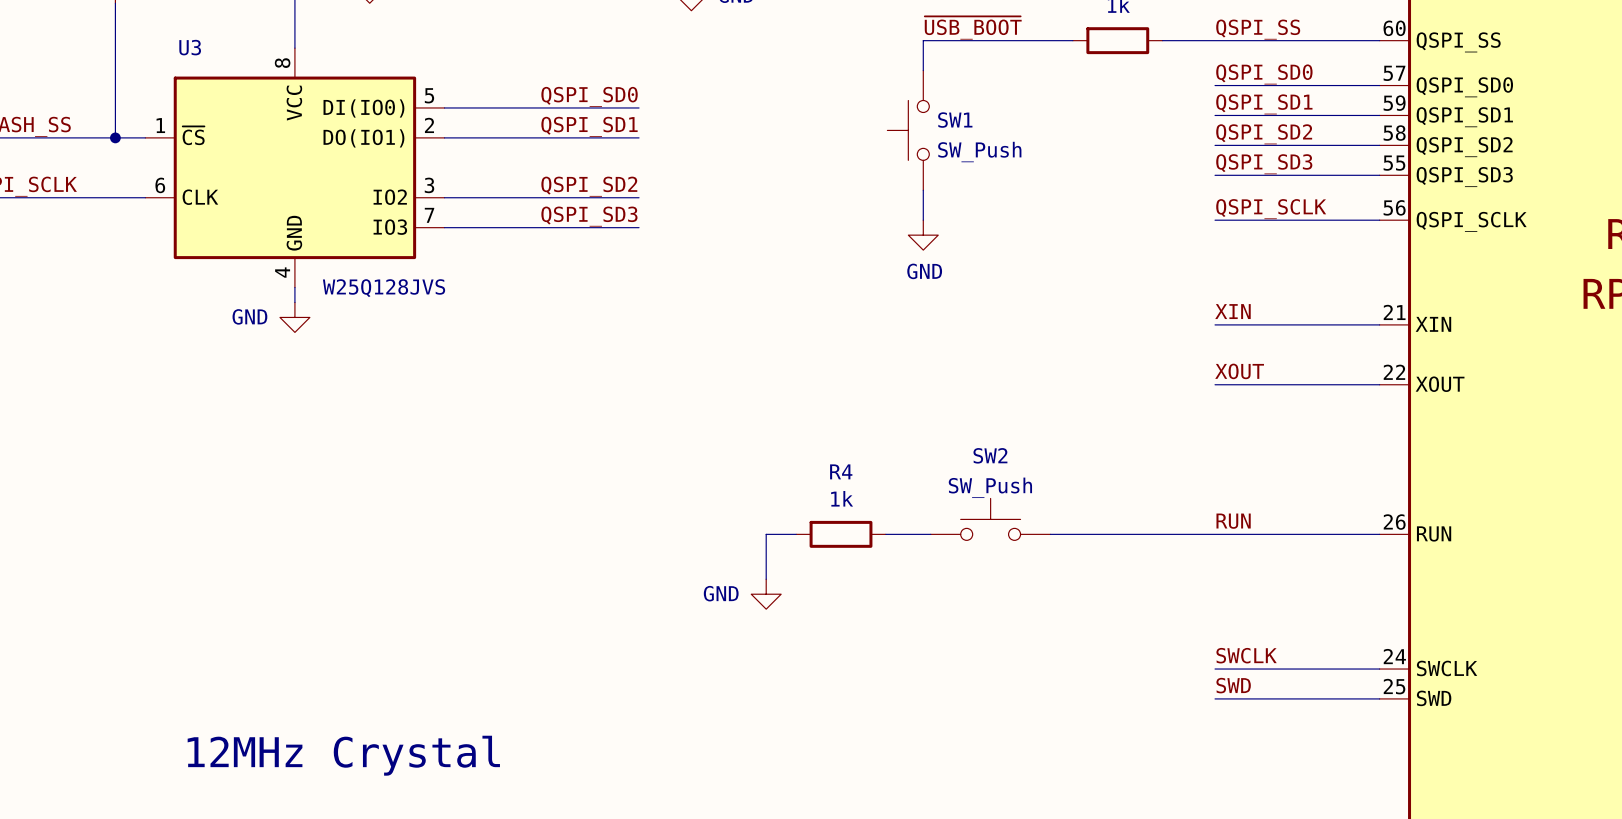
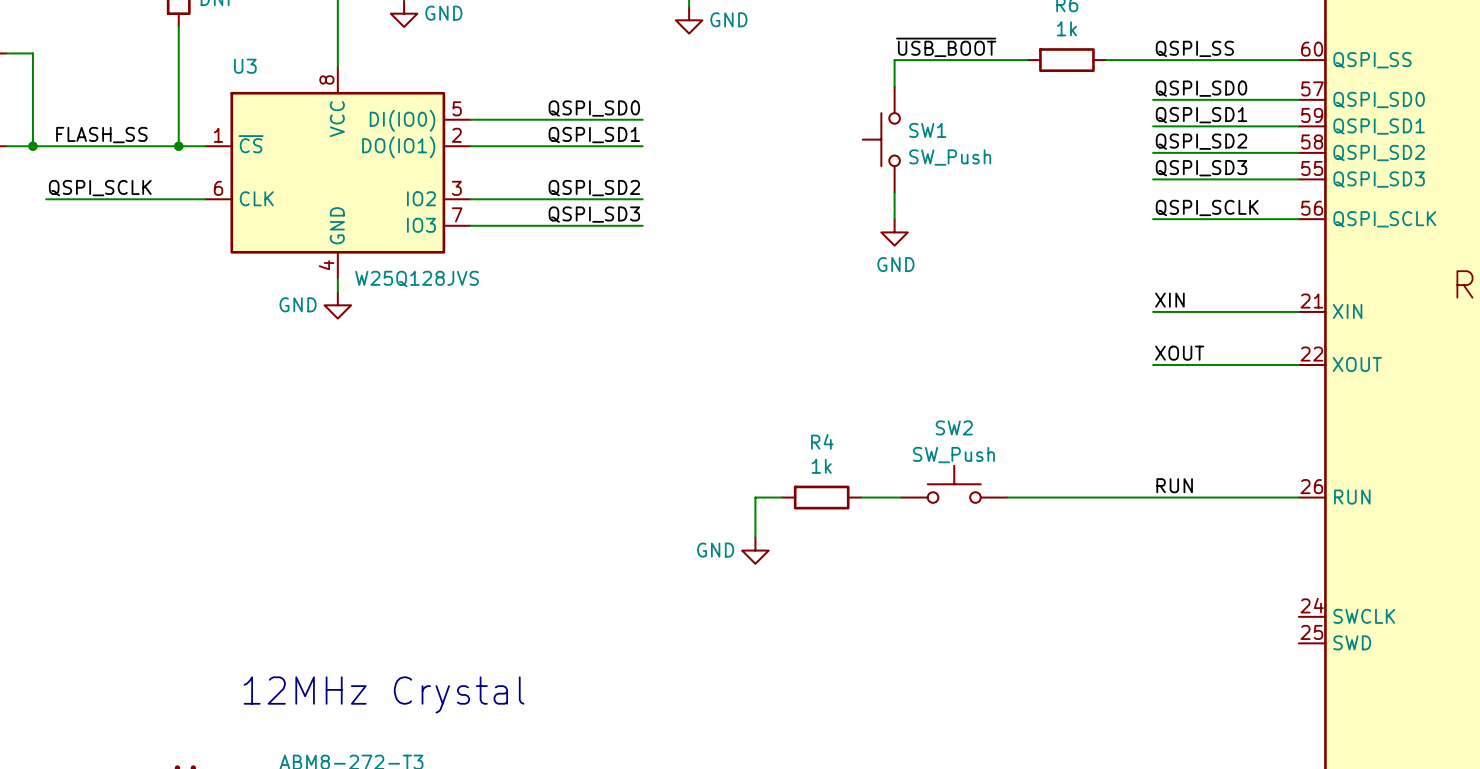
label: SWCLK (1246, 655) -> none
wire: (1215, 669) (1379, 669) -> none
label: SWD (1233, 685) -> none
wire: (1215, 698) (1379, 698) -> none

